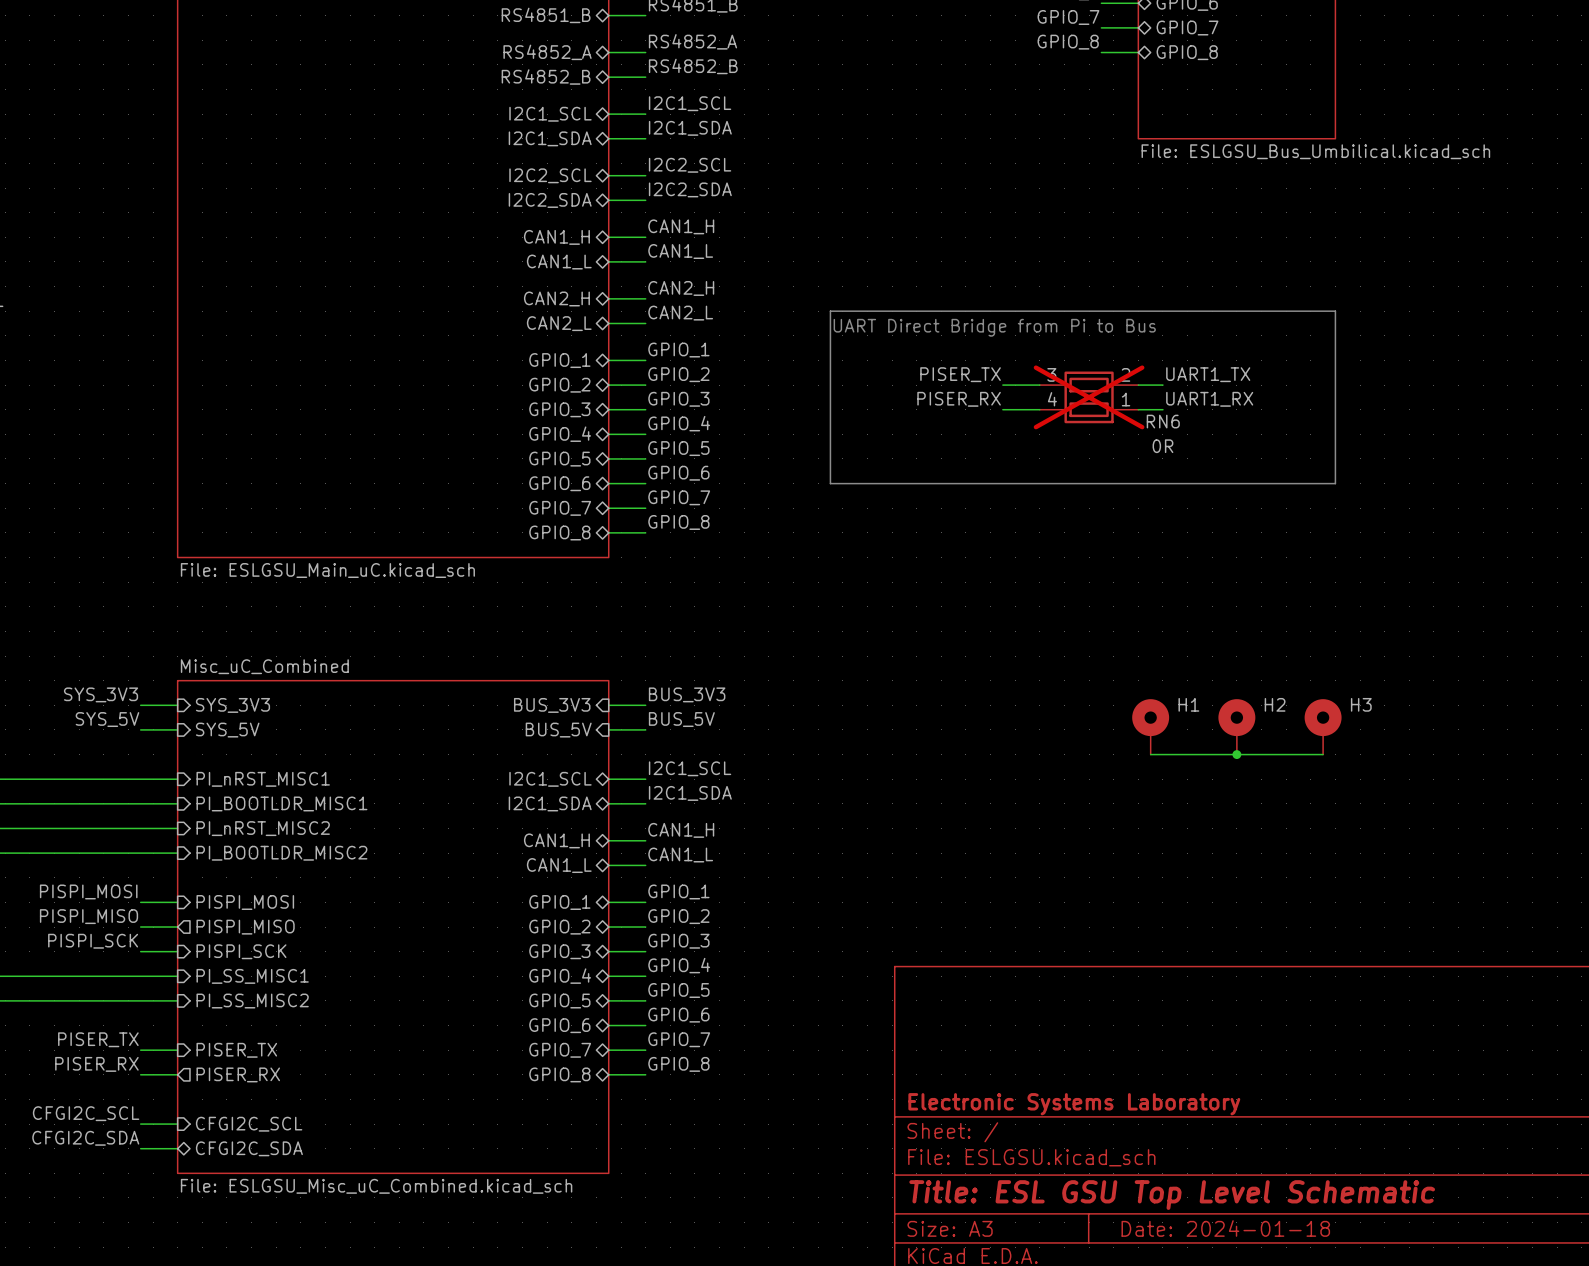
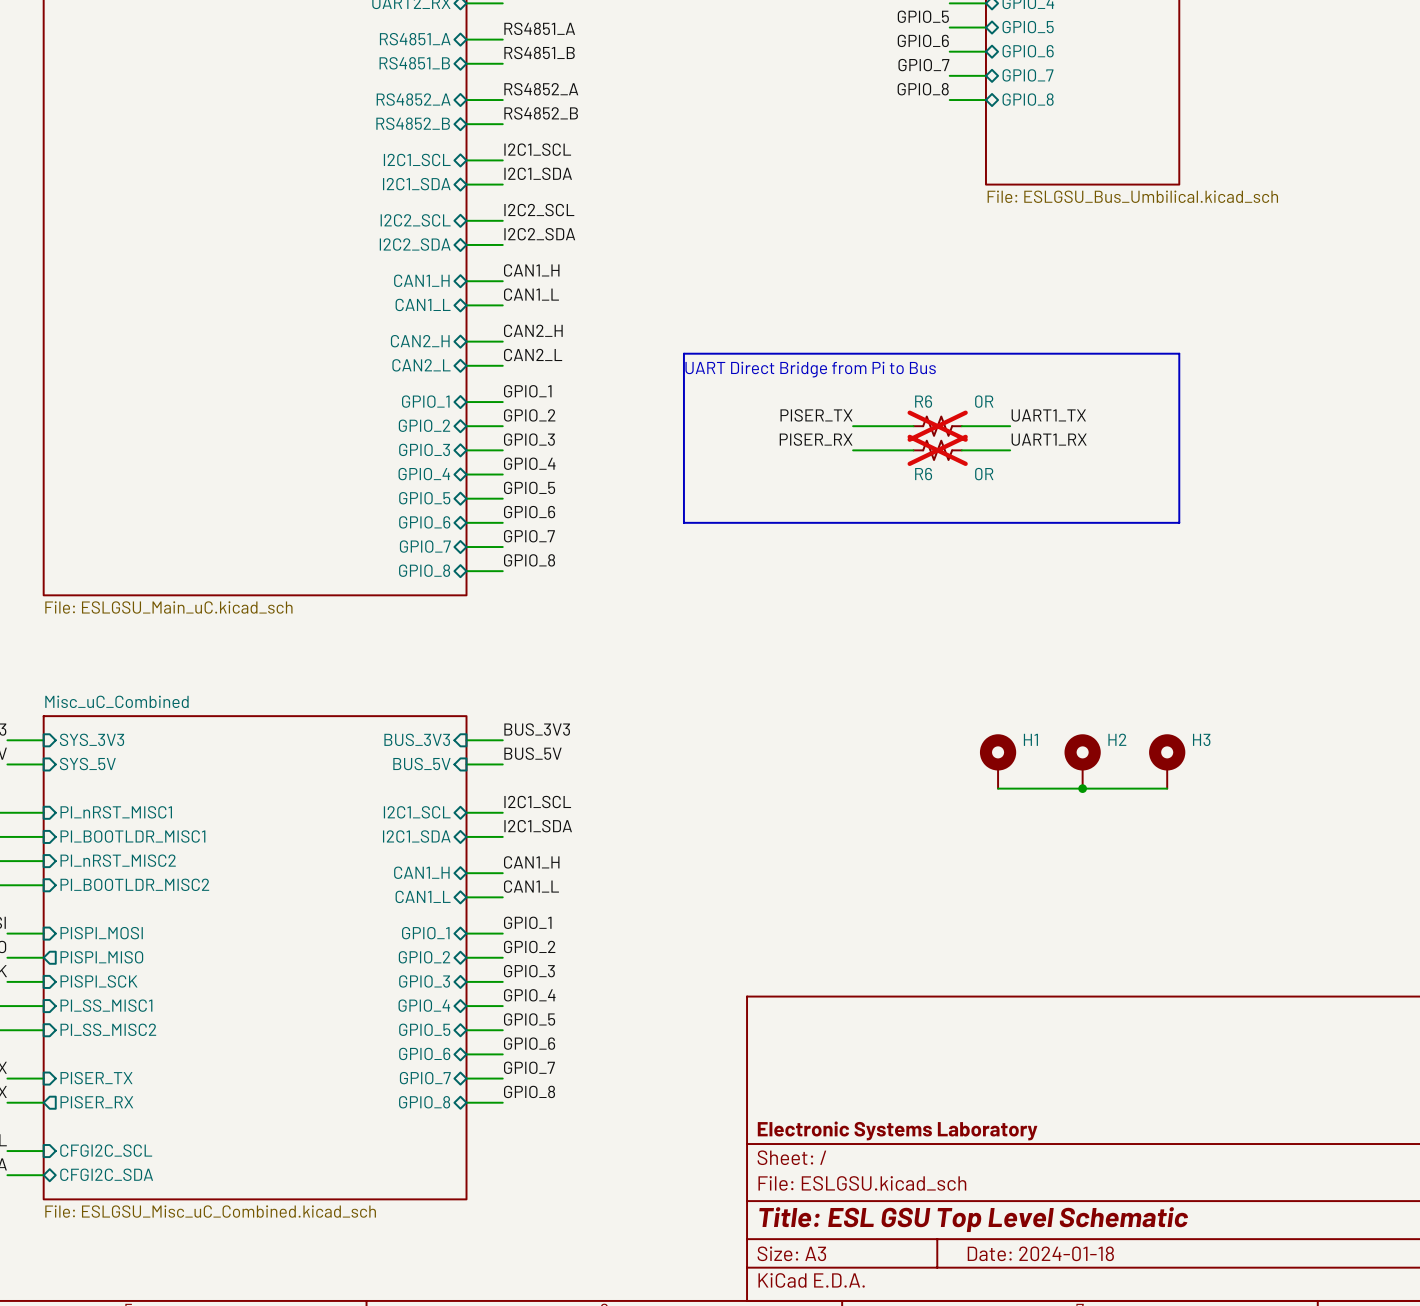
R6: none -> 0R (937, 426)
RN6: 0R (1089, 397) -> none
R6: none -> 0R (937, 450)

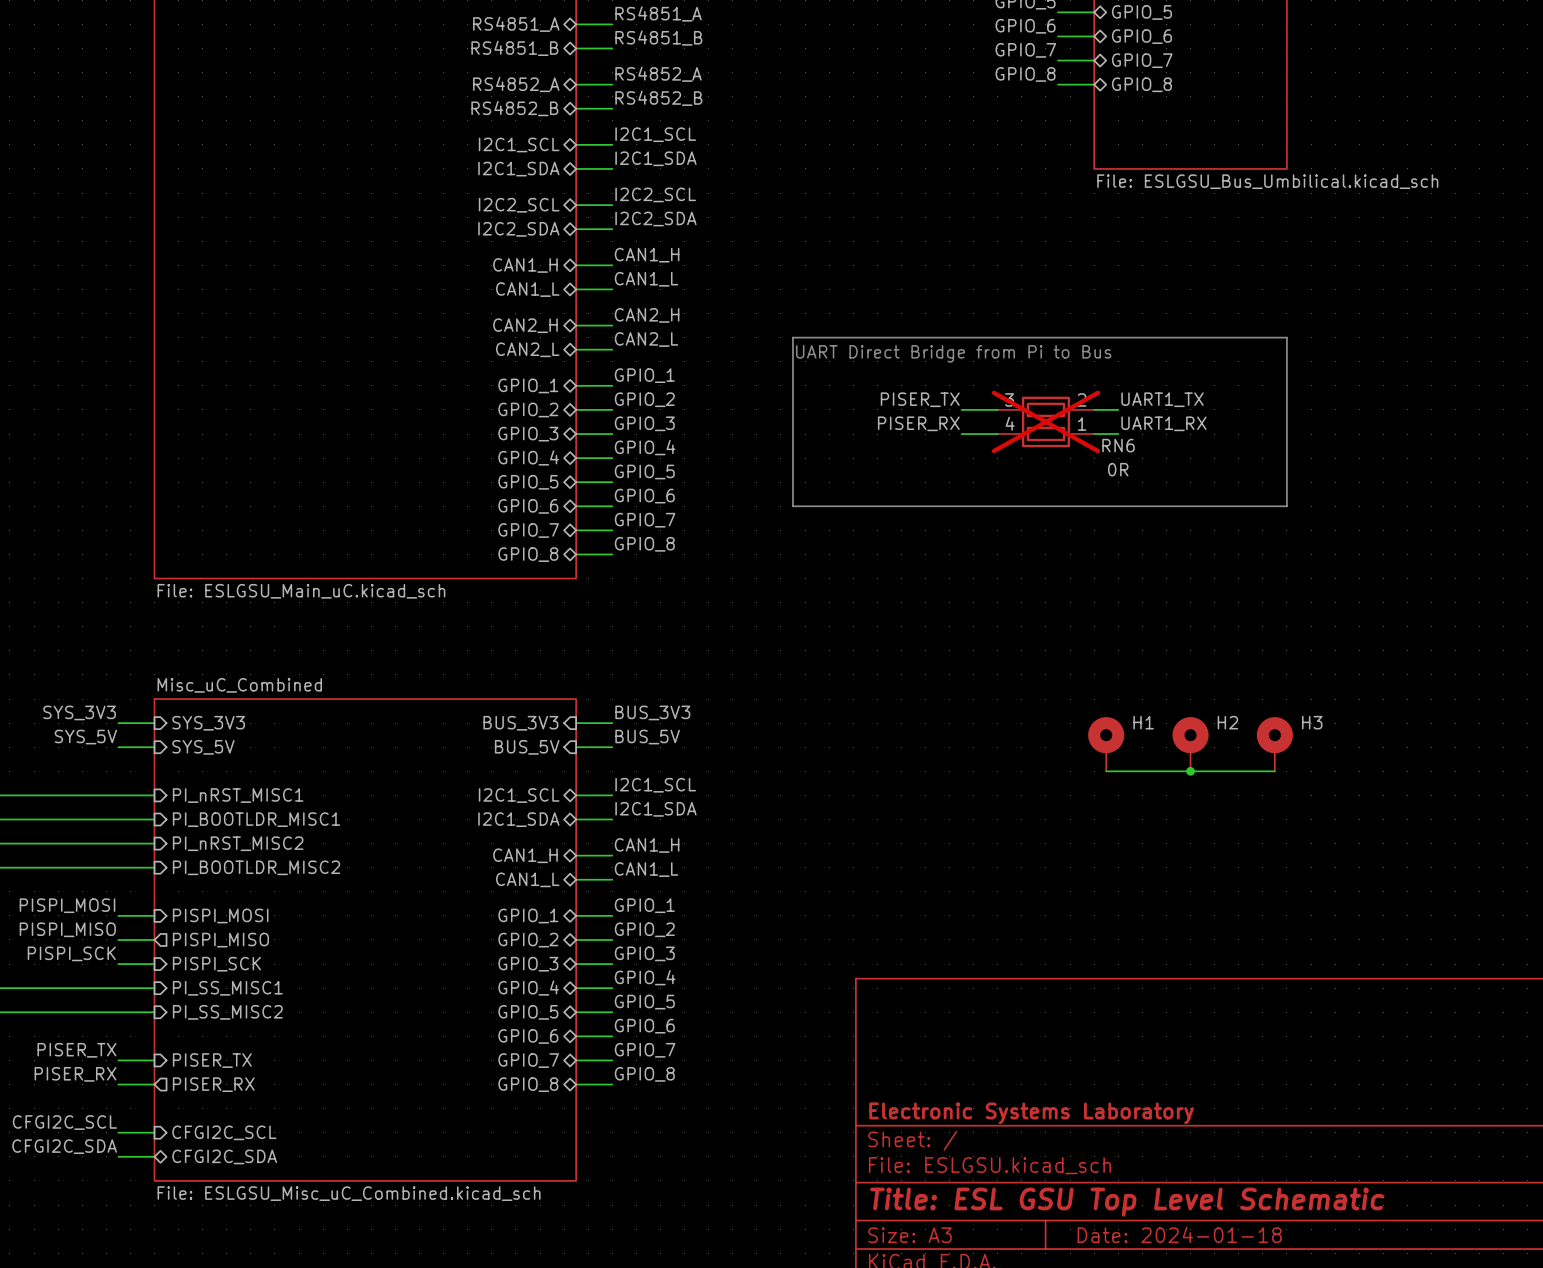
R6: 0R (937, 426) -> none
RN6: none -> 0R (1045, 421)
R6: 0R (937, 450) -> none

